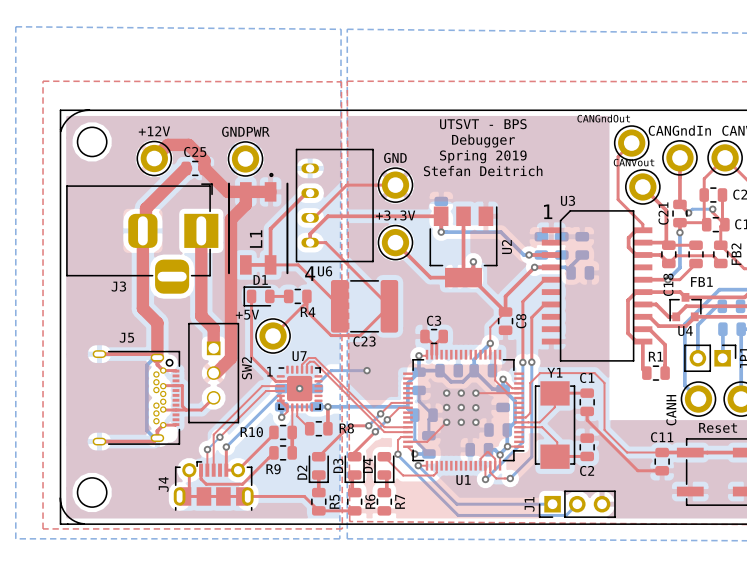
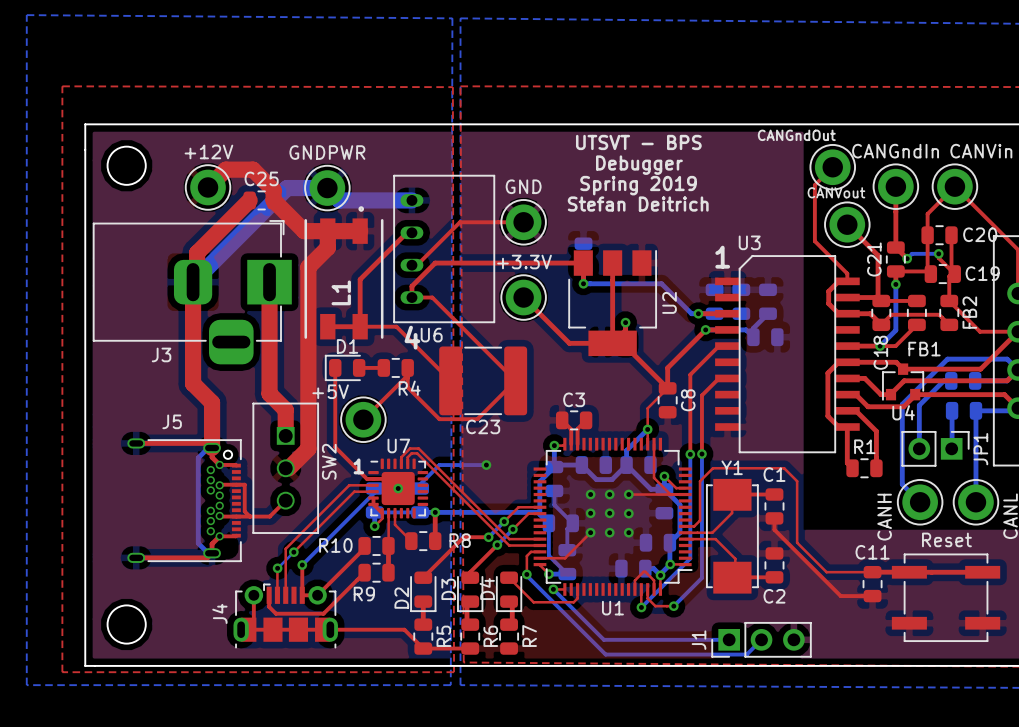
board edge: (89, 110) (71, 116) (60, 131) -> none
bottom track: none -> (411, 200) (339, 200) (327, 188) (287, 188) (197, 278)
board edge: (60, 498) (62, 507) (67, 515) (74, 521) (84, 523) -> none

